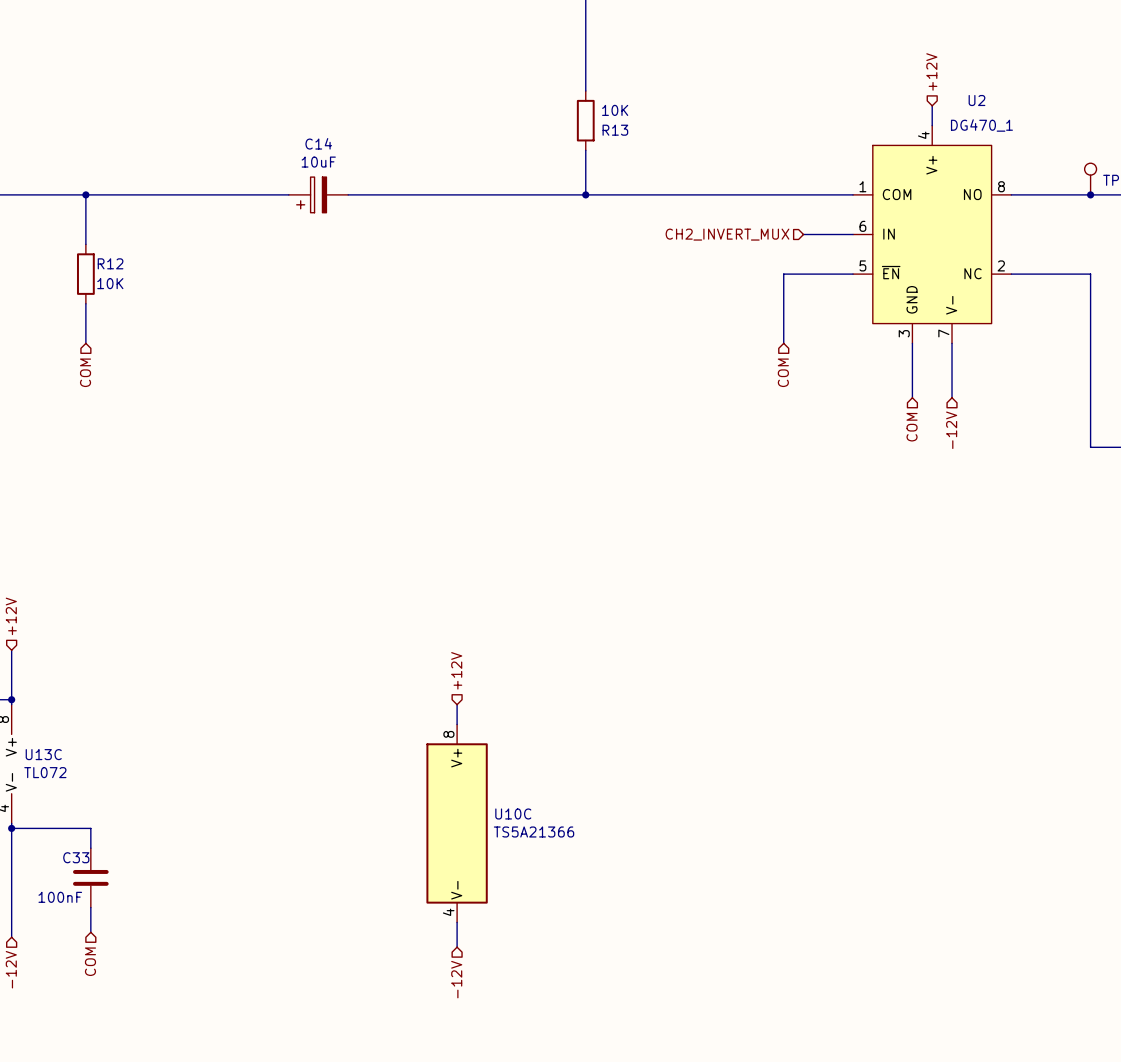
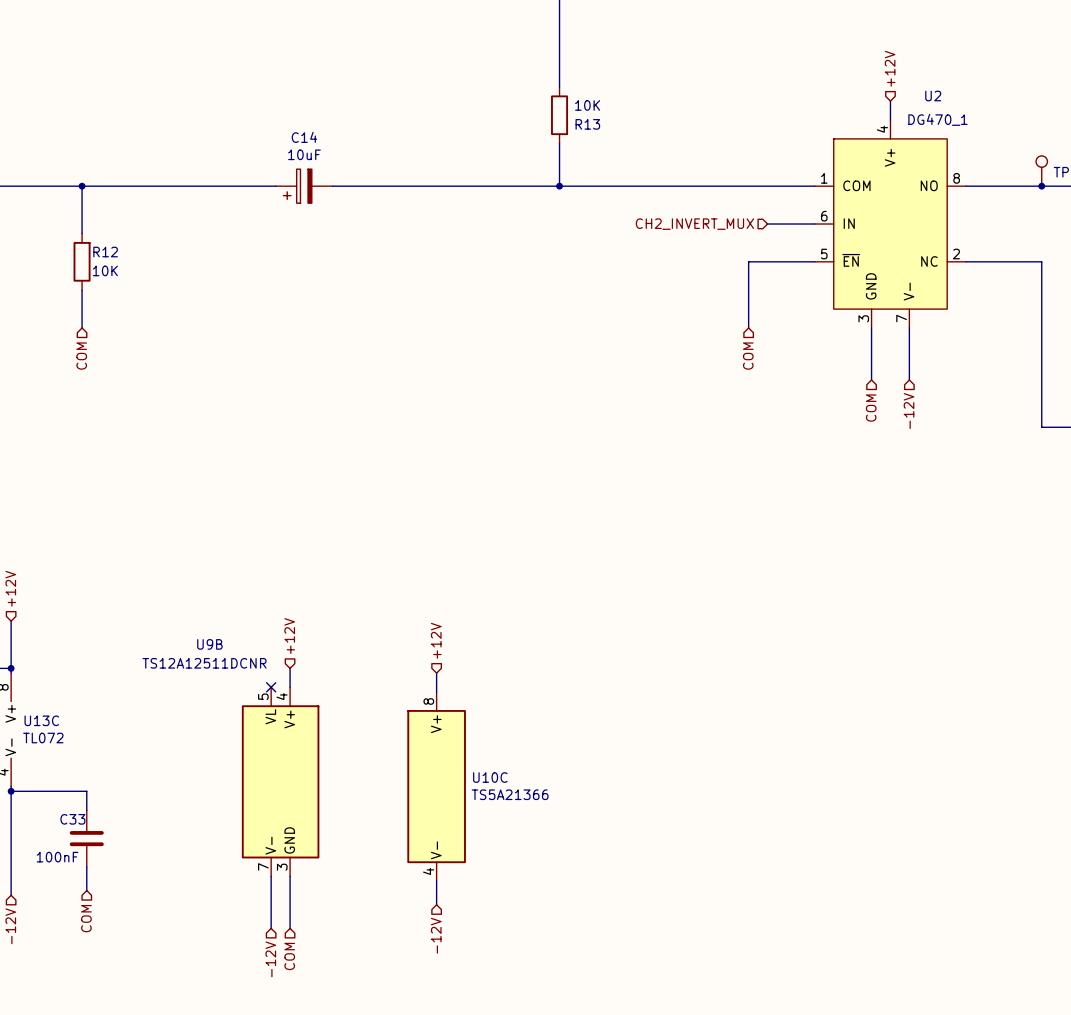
hierarchical label: none -> +12V (289, 636)
wire: none -> (290, 668) (290, 687)
no-connect mark: none -> (271, 687)
U9B: none -> TS12A12511DCNR (280, 781)
wire: none -> (271, 876) (271, 928)
wire: none -> (290, 876) (290, 928)
hierarchical label: none -> COM (289, 956)
hierarchical label: none -> -12V (270, 959)

